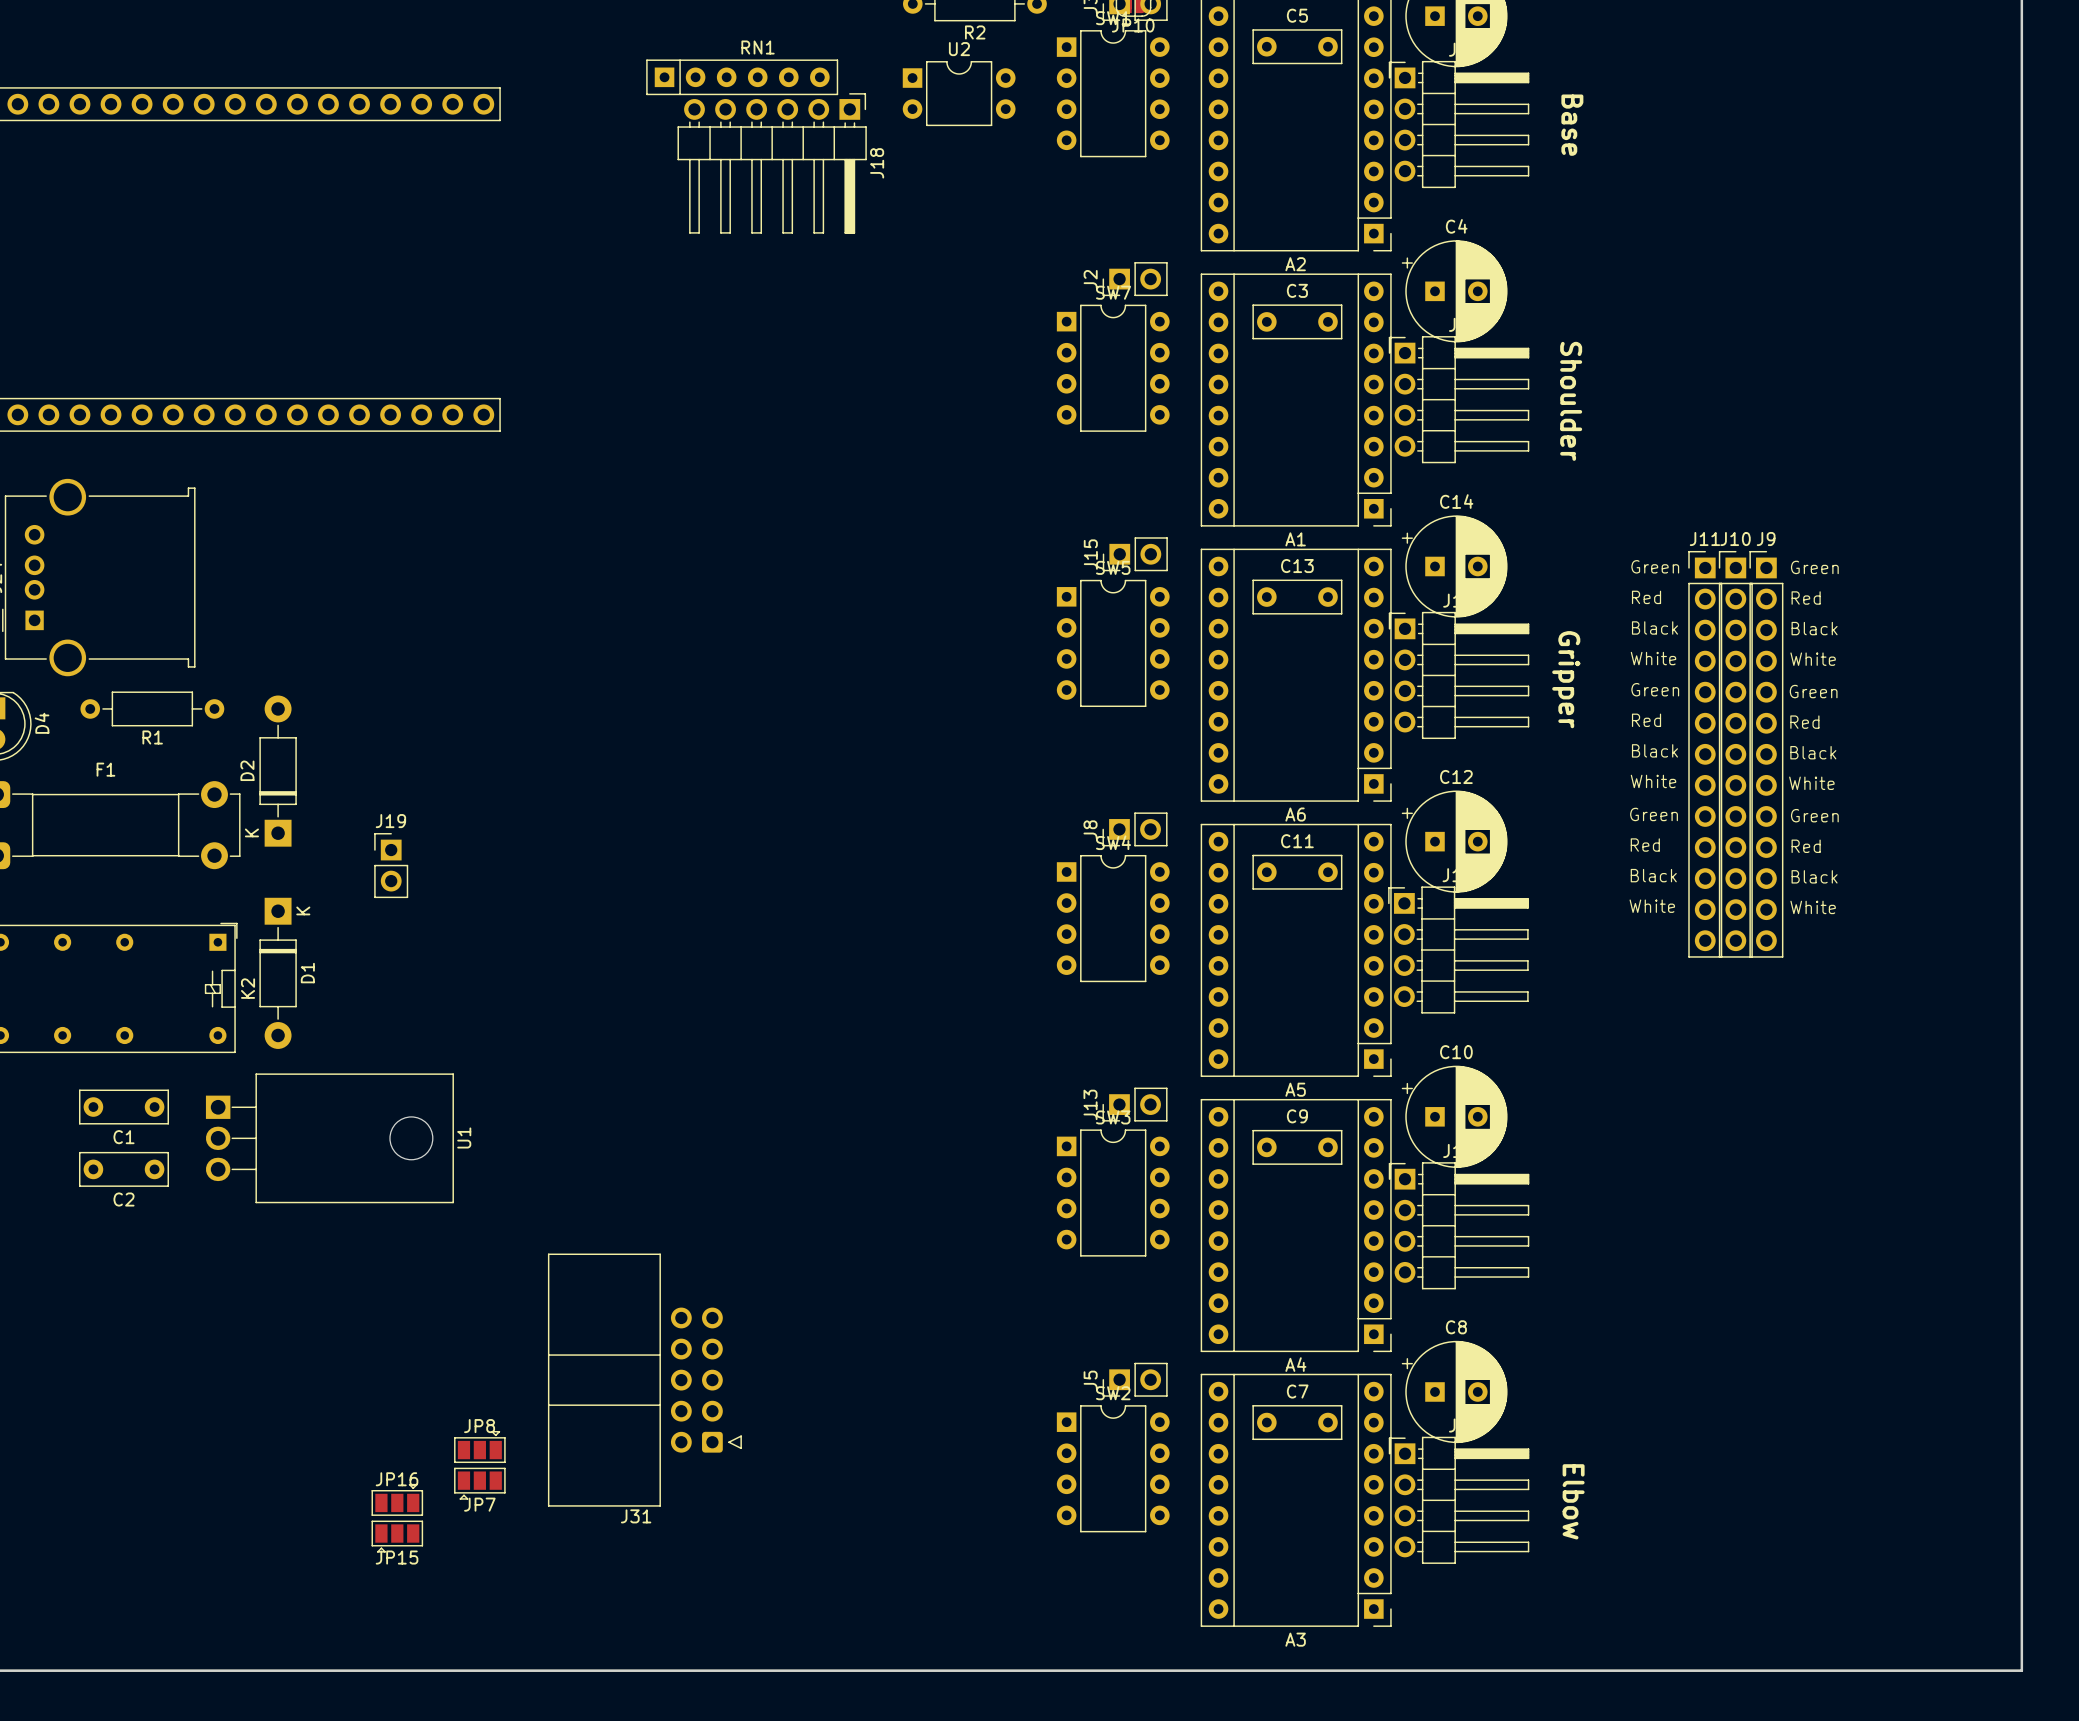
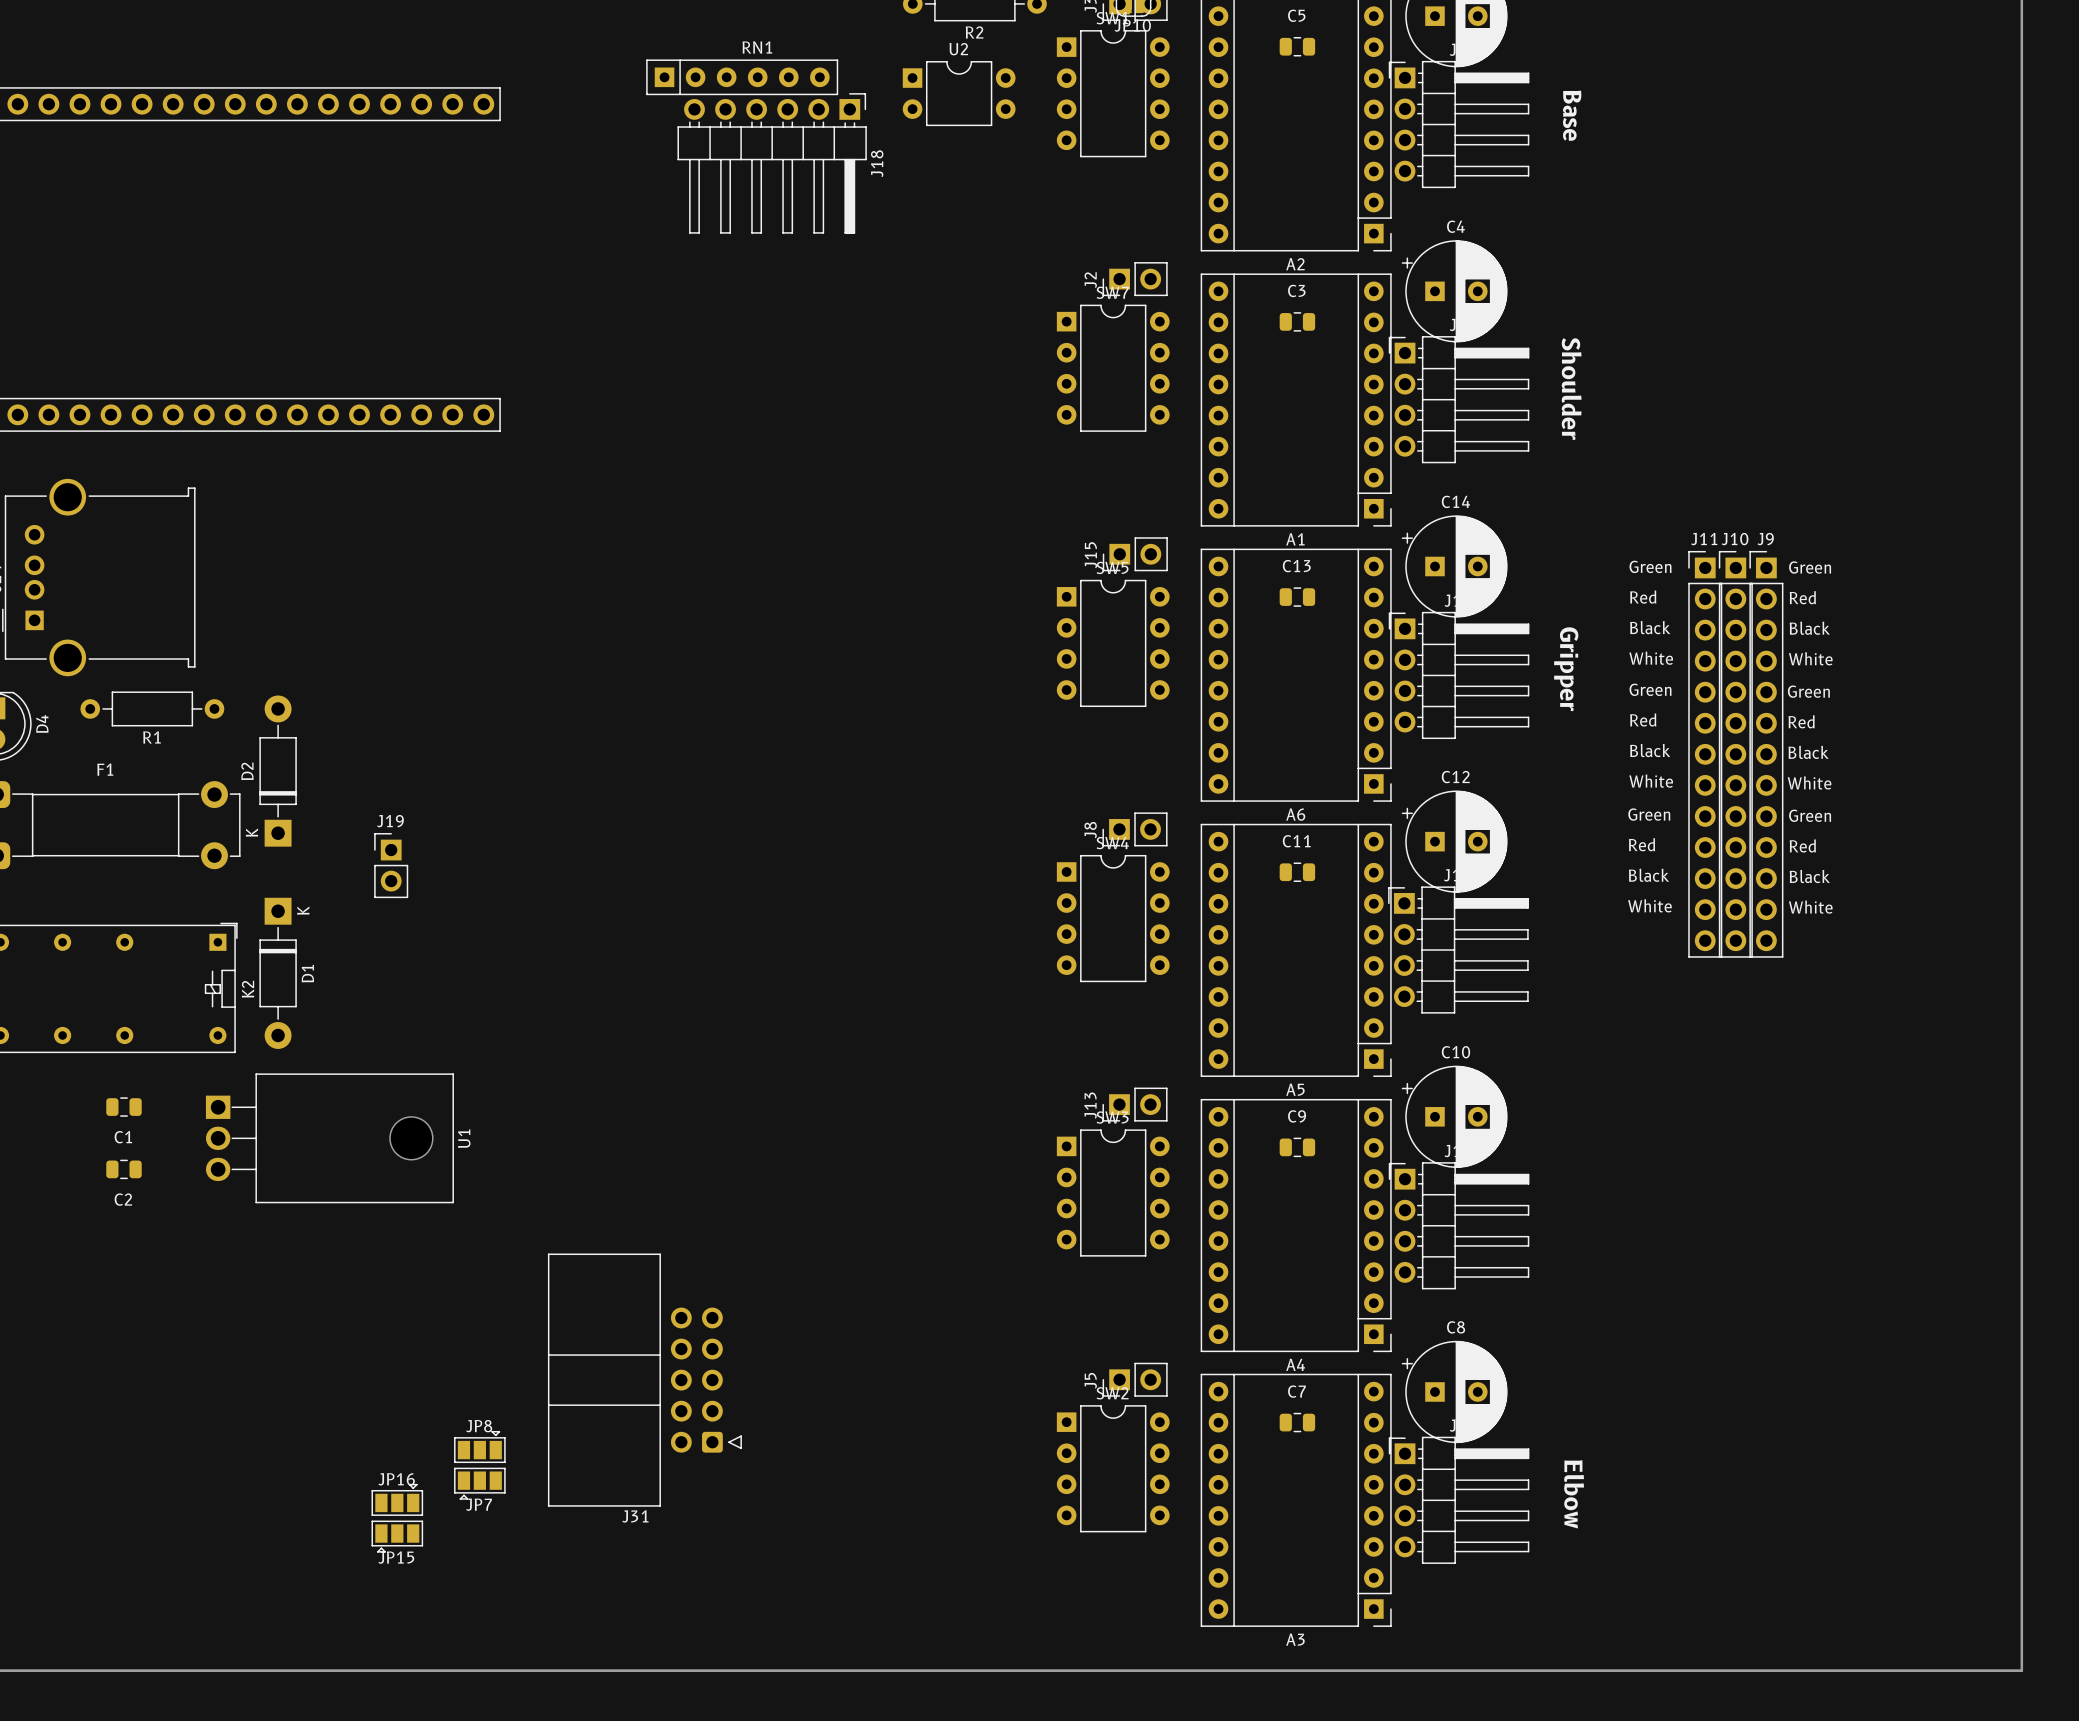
C5 footprint: [1252, 29, 1343, 65] -> [1279, 37, 1316, 57]
C3 footprint: [1252, 304, 1343, 340] -> [1279, 312, 1316, 332]
C13 footprint: [1252, 579, 1343, 615] -> [1279, 587, 1316, 607]
C11 footprint: [1252, 854, 1343, 890] -> [1279, 862, 1316, 882]
C1 footprint: [78, 1089, 170, 1125] -> [106, 1097, 142, 1117]
C9 footprint: [1252, 1129, 1343, 1165] -> [1279, 1137, 1316, 1158]
C2 footprint: [78, 1151, 170, 1187] -> [106, 1159, 142, 1180]
C7 footprint: [1252, 1405, 1343, 1441] -> [1279, 1412, 1316, 1433]

